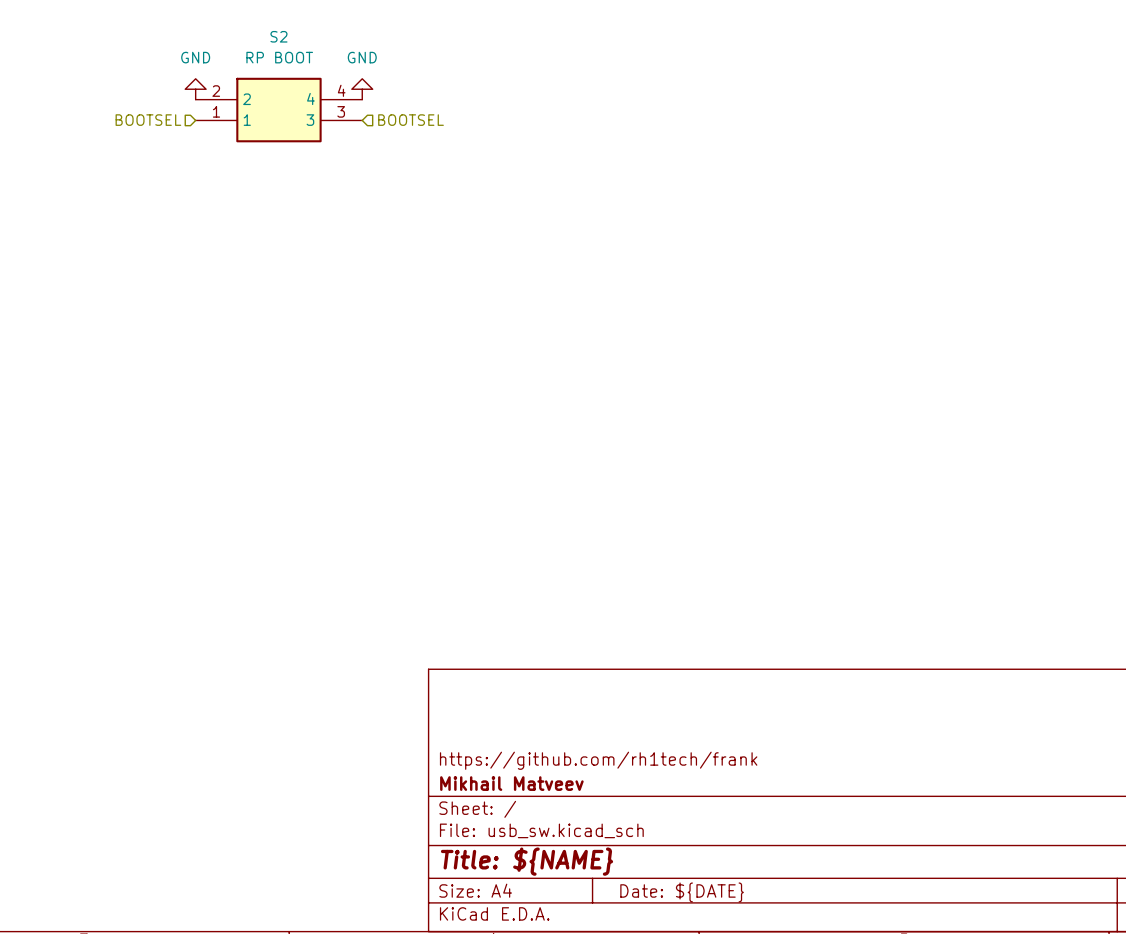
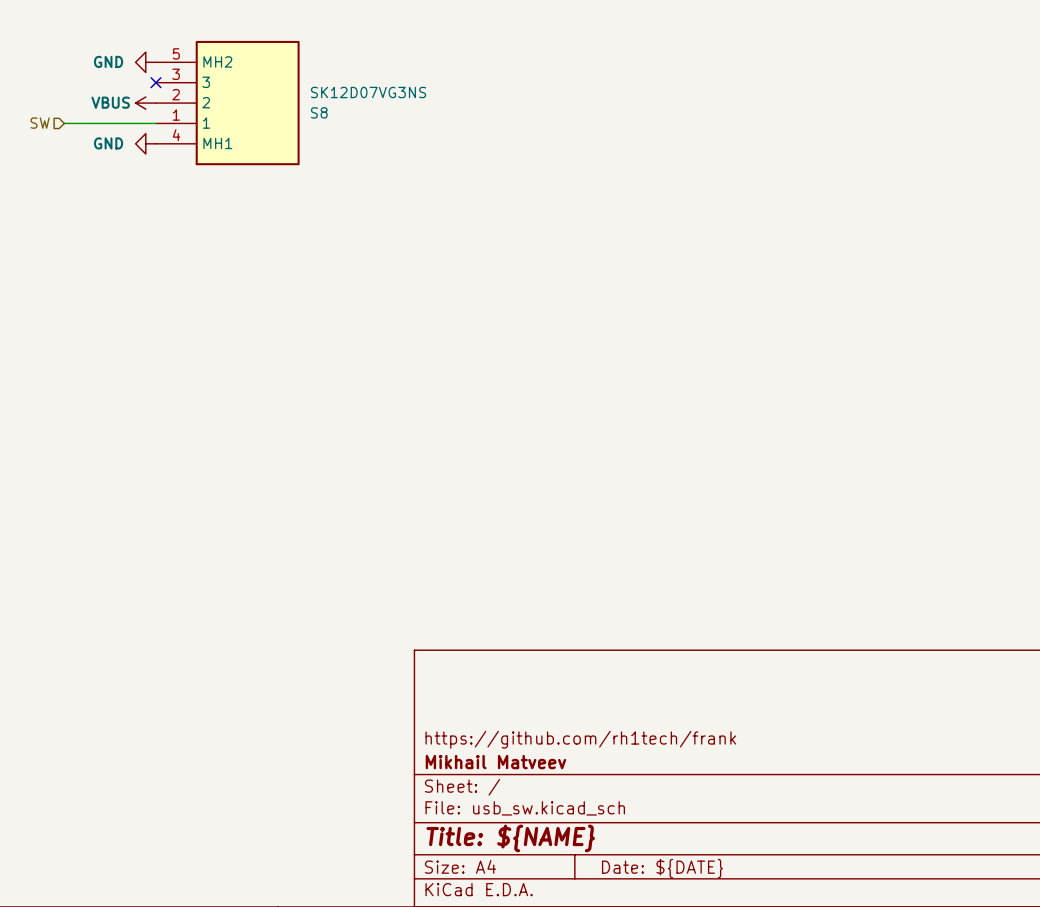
power symbol: none -> GND (145, 62)
no-connect mark: none -> (155, 82)
power symbol: GND (195, 89) -> none
power symbol: GND (362, 89) -> none
power symbol: none -> VBUS (145, 103)
S8: none -> SK12D07VG3NS (227, 103)
S2: RP BOOT (278, 110) -> none
hierarchical label: BOOTSEL (148, 120) -> none
hierarchical label: BOOTSEL (411, 120) -> none
hierarchical label: none -> SW (40, 123)
wire: none -> (64, 123) (155, 123)
power symbol: none -> GND (145, 143)

